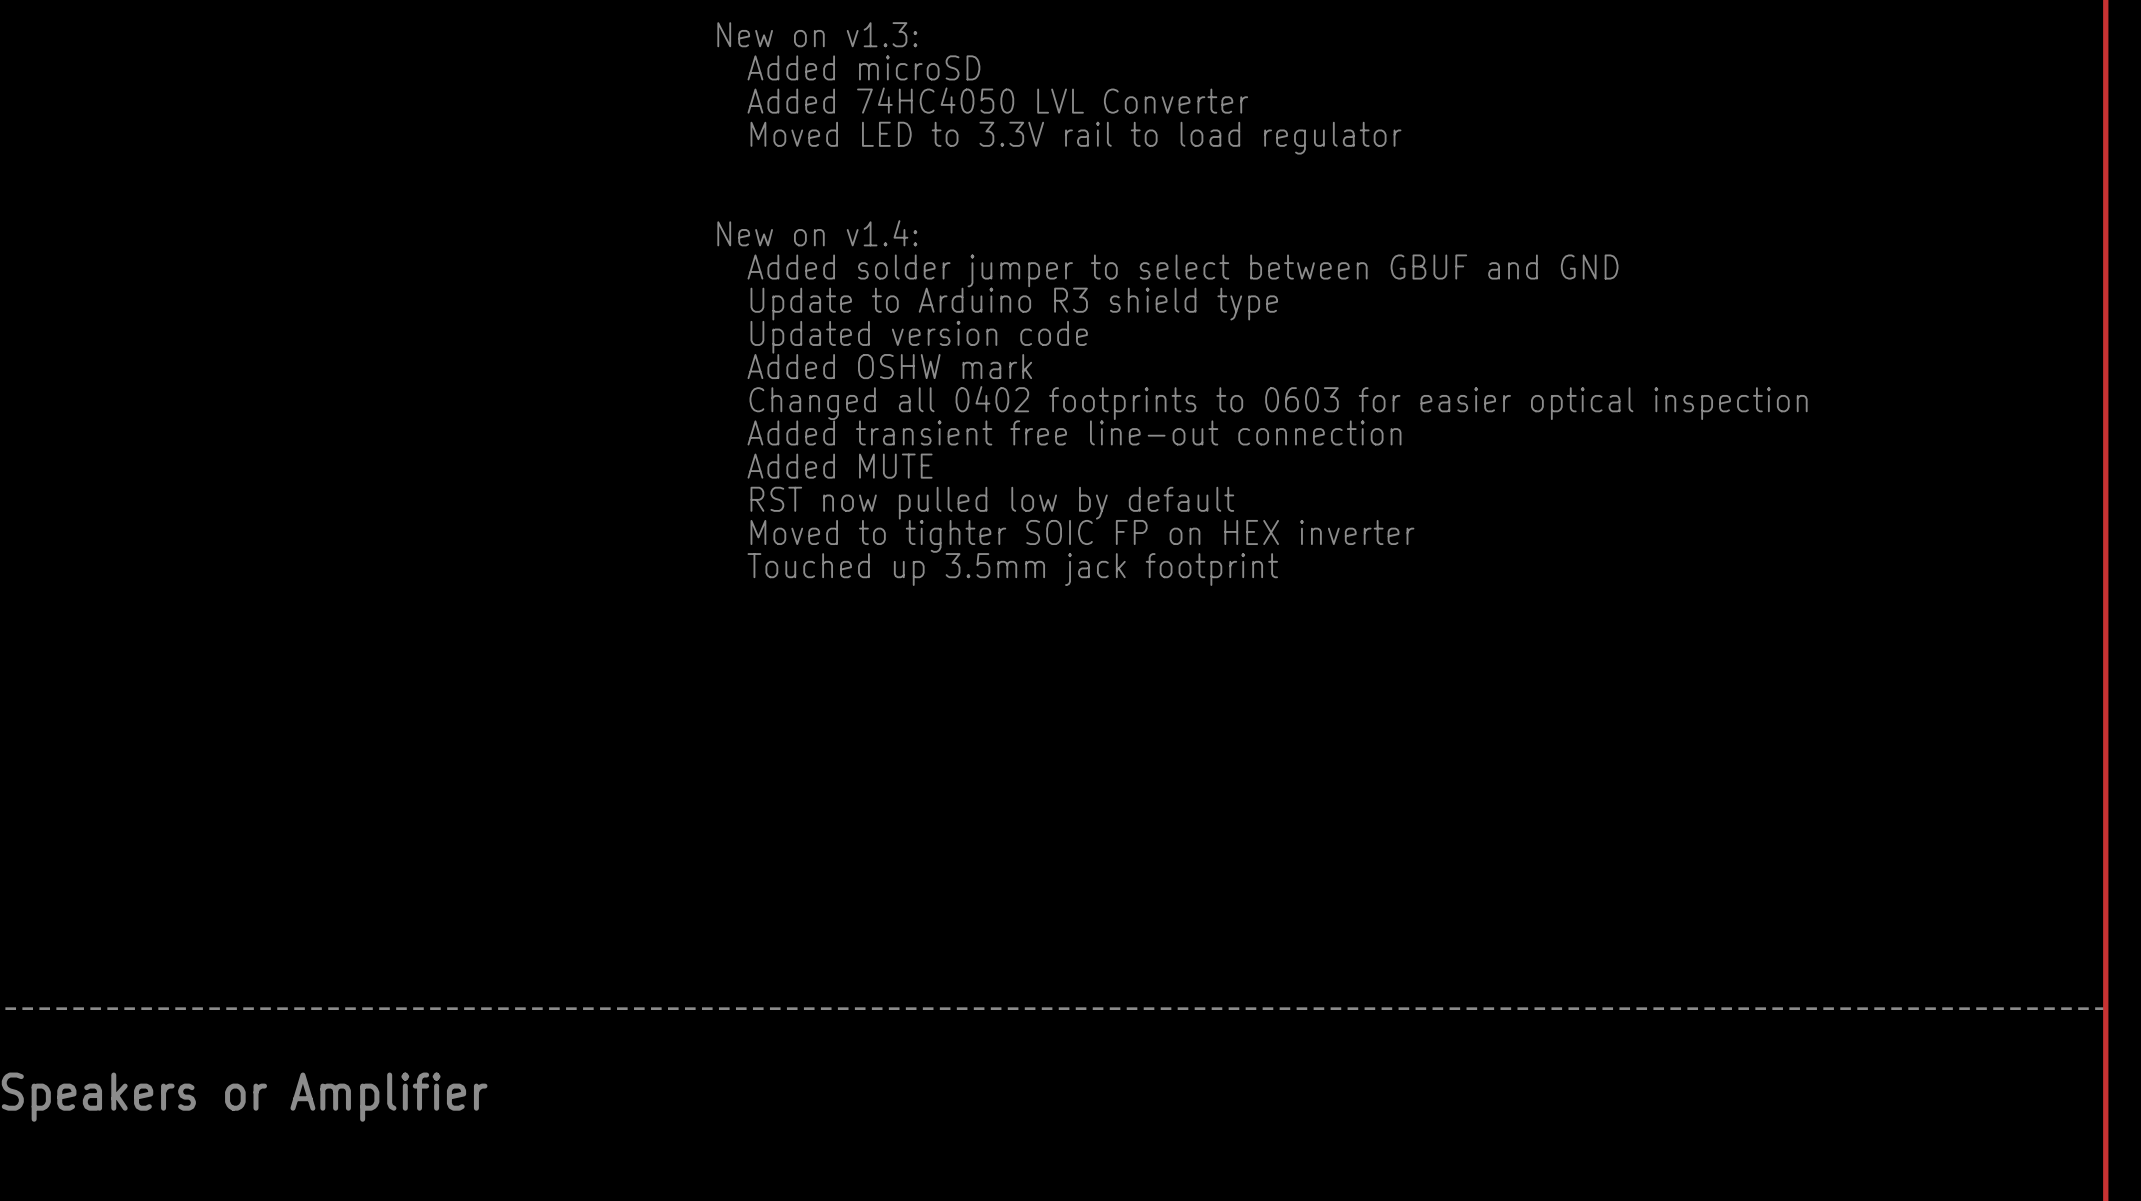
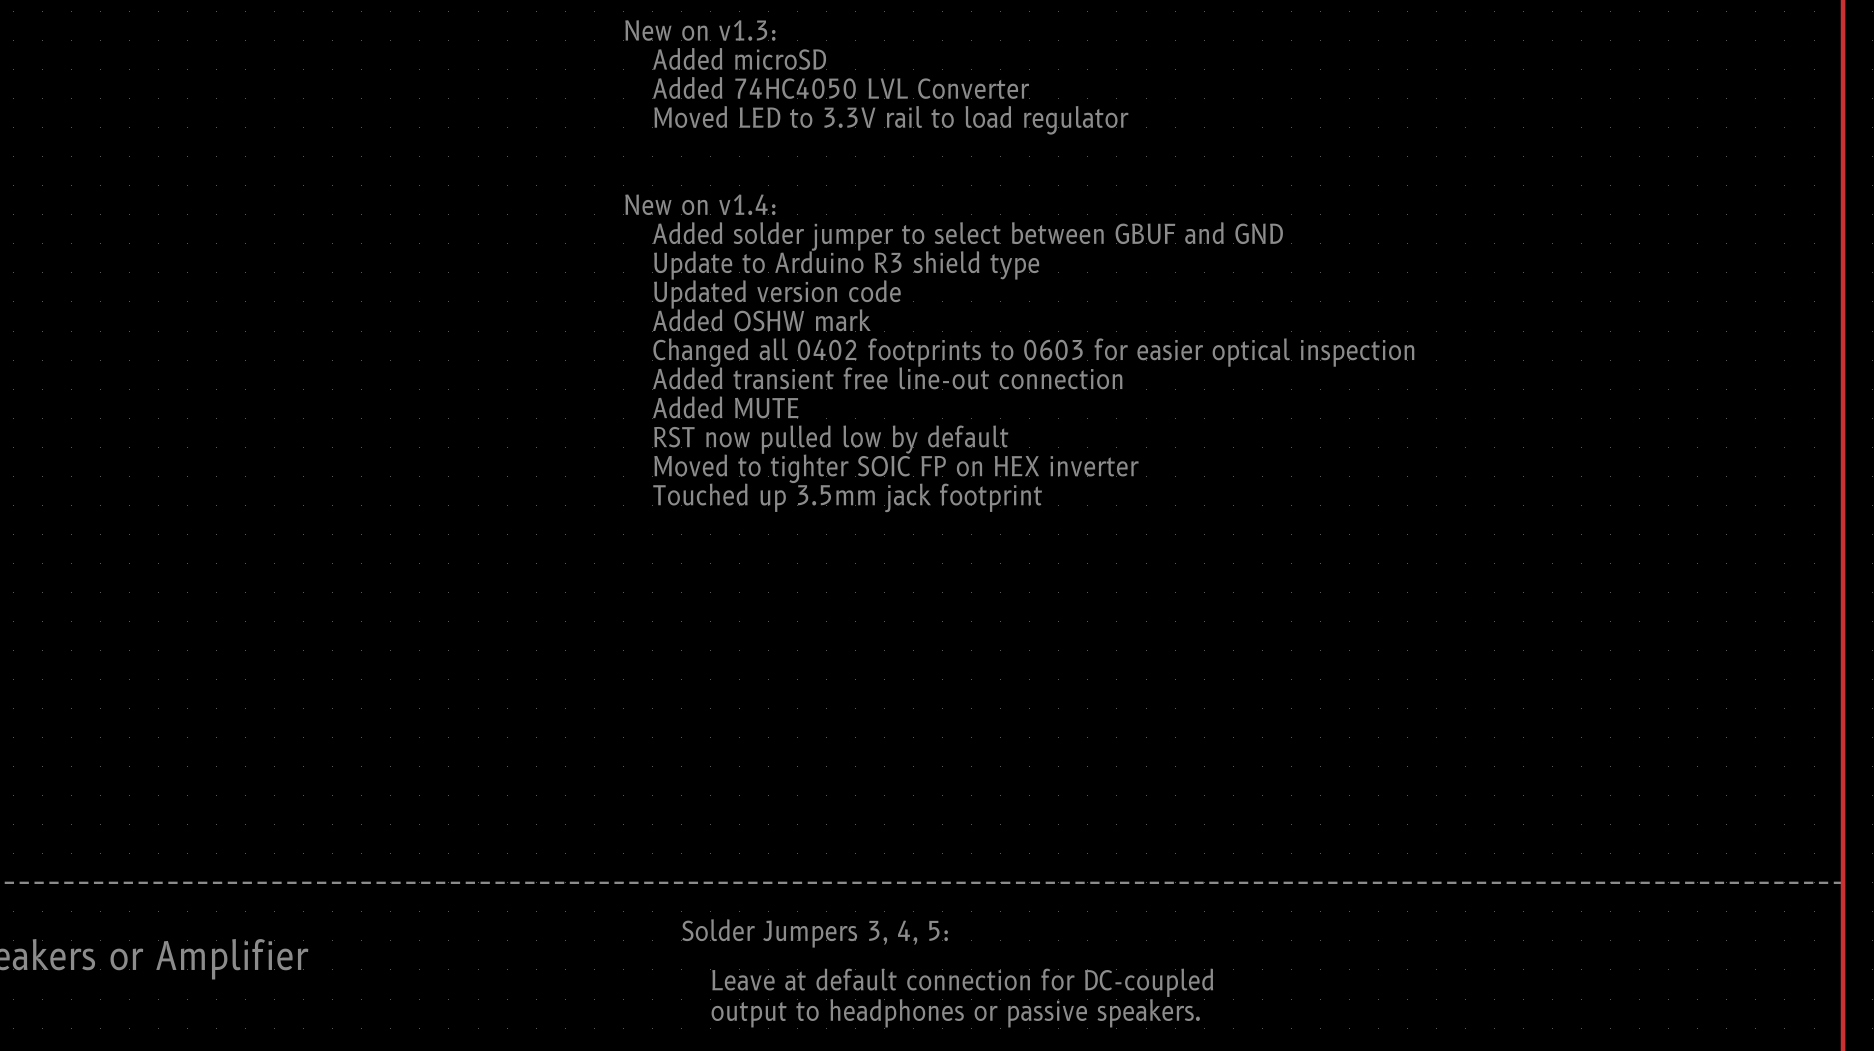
text: none -> Solder Jumpers 3, 4, 5: (815, 933)
text: none -> Leave at default connection for DC-coupled (962, 982)
text: none -> output to headphones or passive speakers. (955, 1013)

